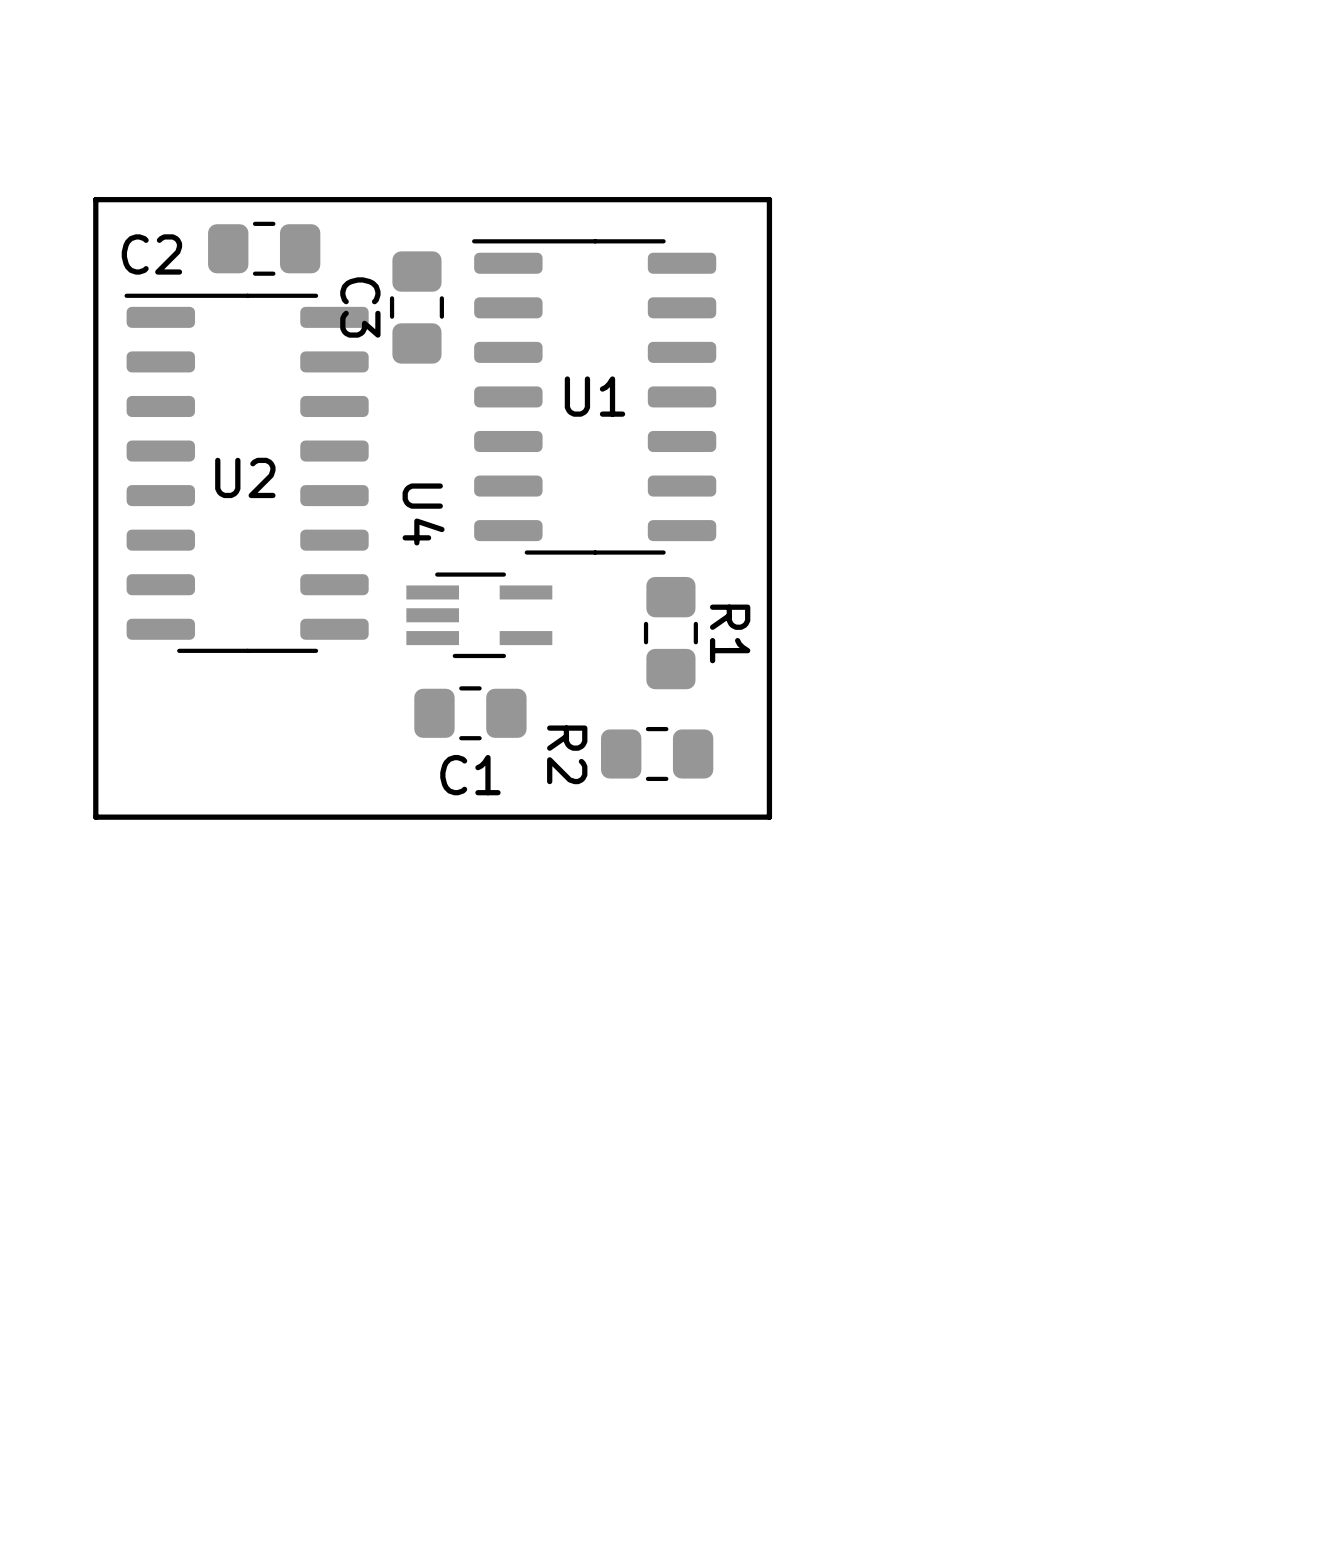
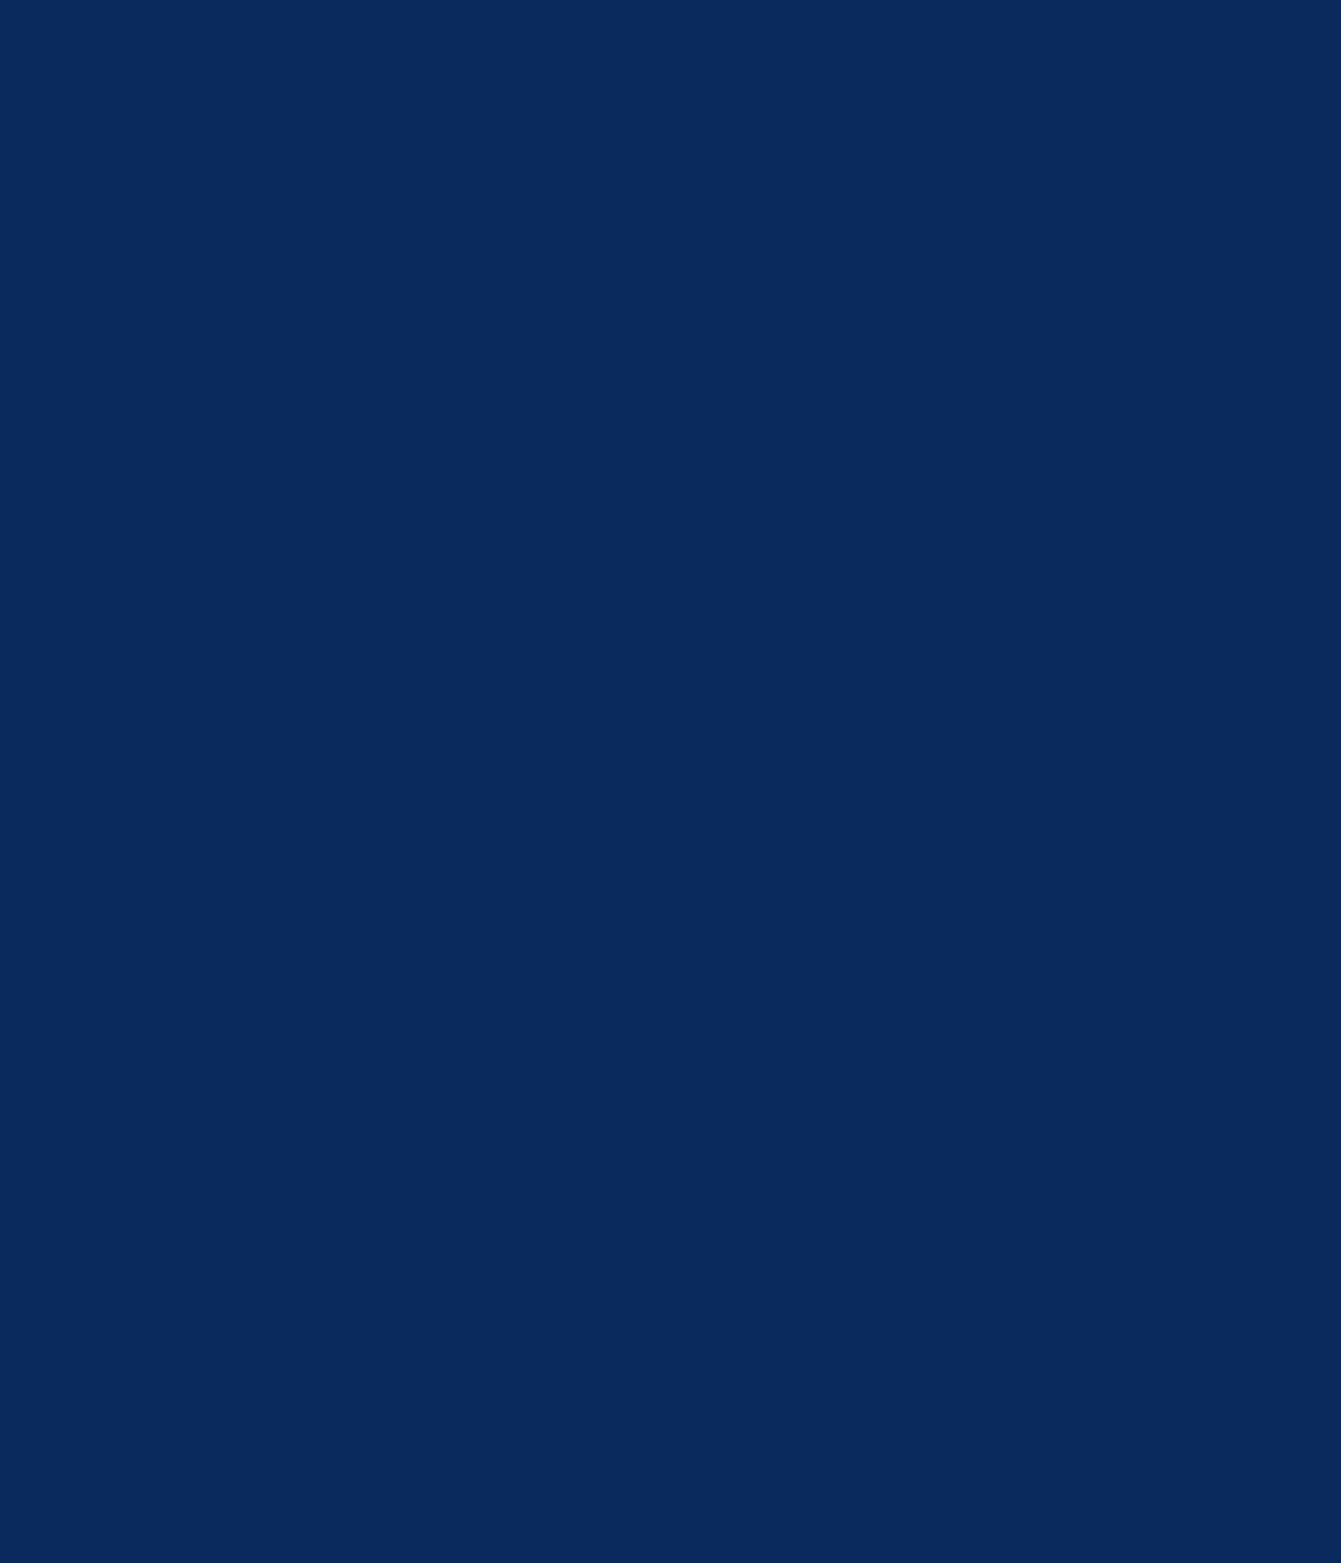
board edge: (769, 199) (769, 817) (95, 817) (95, 199) (769, 199) -> none
C2: (264, 248) -> none
C3: (416, 307) -> none
U1: (594, 396) -> none
U2: (246, 473) -> none
U4: (479, 615) -> none
R1: (670, 633) -> none
C1: (470, 713) -> none
R2: (657, 753) -> none

